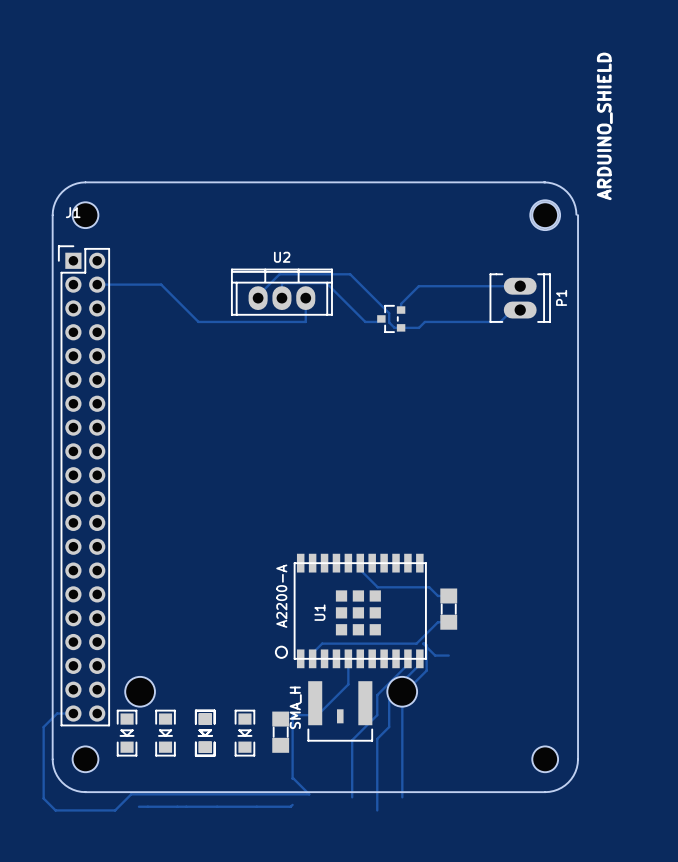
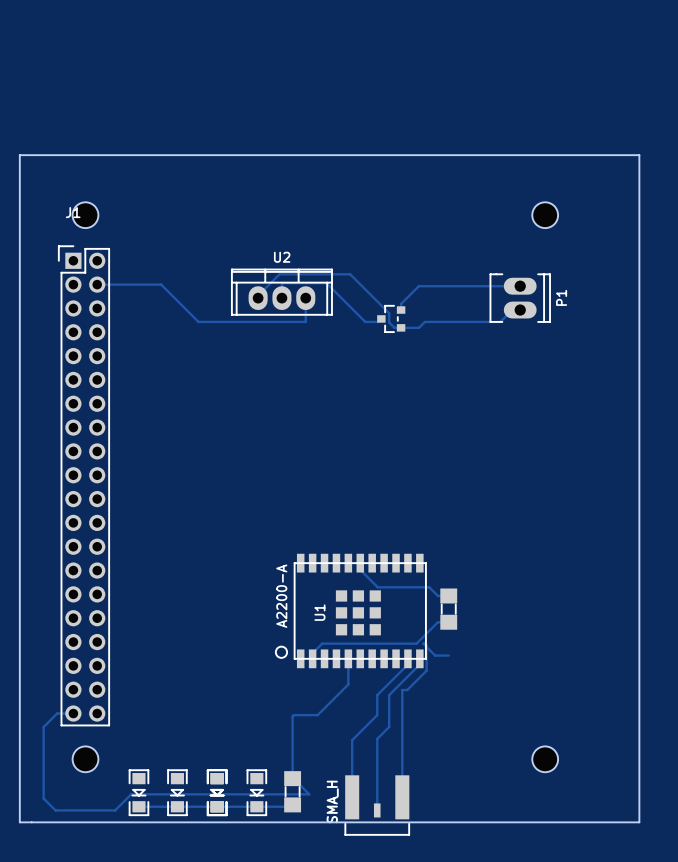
board edge: none -> (19, 155) (19, 822) (639, 822) (639, 155) (19, 155)
board edge: (544, 182) (556, 184) (566, 191) (573, 202) (576, 214) -> none
board edge: (545, 182) (85, 182) (69, 186) (59, 195) (55, 202) (52, 215) (52, 759) (55, 771) (62, 782) (72, 789) (85, 792) (545, 792) (557, 789) (568, 782) (575, 771) (578, 759) (578, 215) -> none
ARDUINO_SHIELD: (342, 453) -> none
part position: (340, 711) -> (377, 805)
part position: (280, 732) -> (292, 791)
part: (127, 733) -> none
part: (165, 733) -> none
part: (205, 733) -> none
part: (244, 733) -> none
part: none -> (138, 792)
part: none -> (177, 792)
part: none -> (217, 792)
part: none -> (256, 792)

